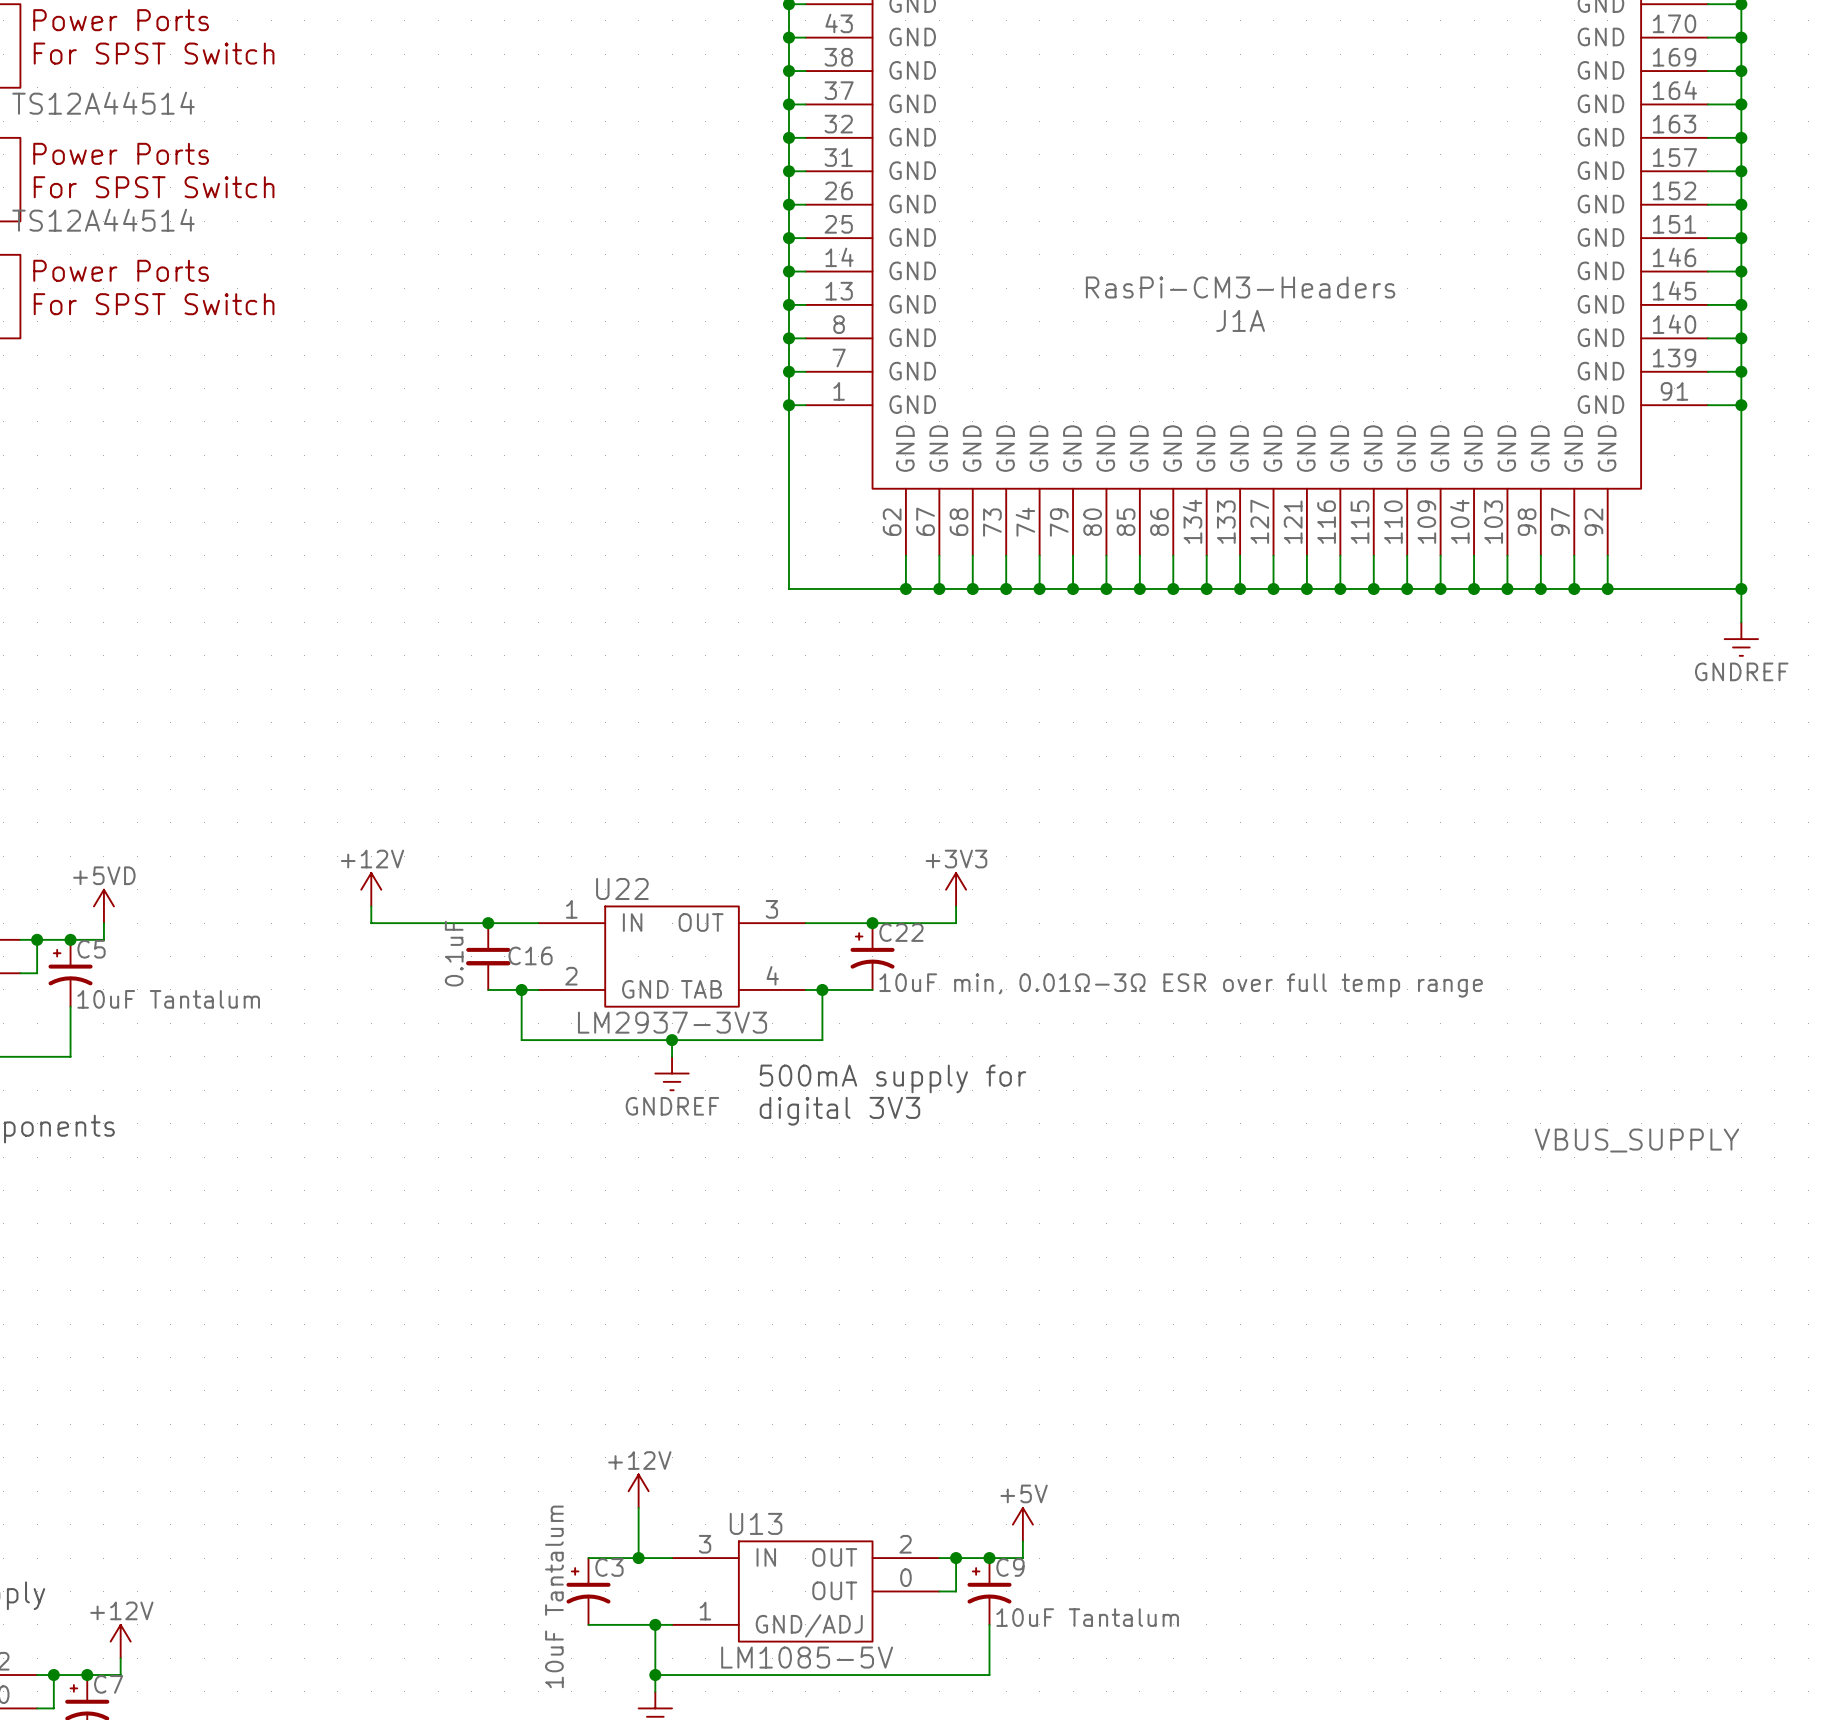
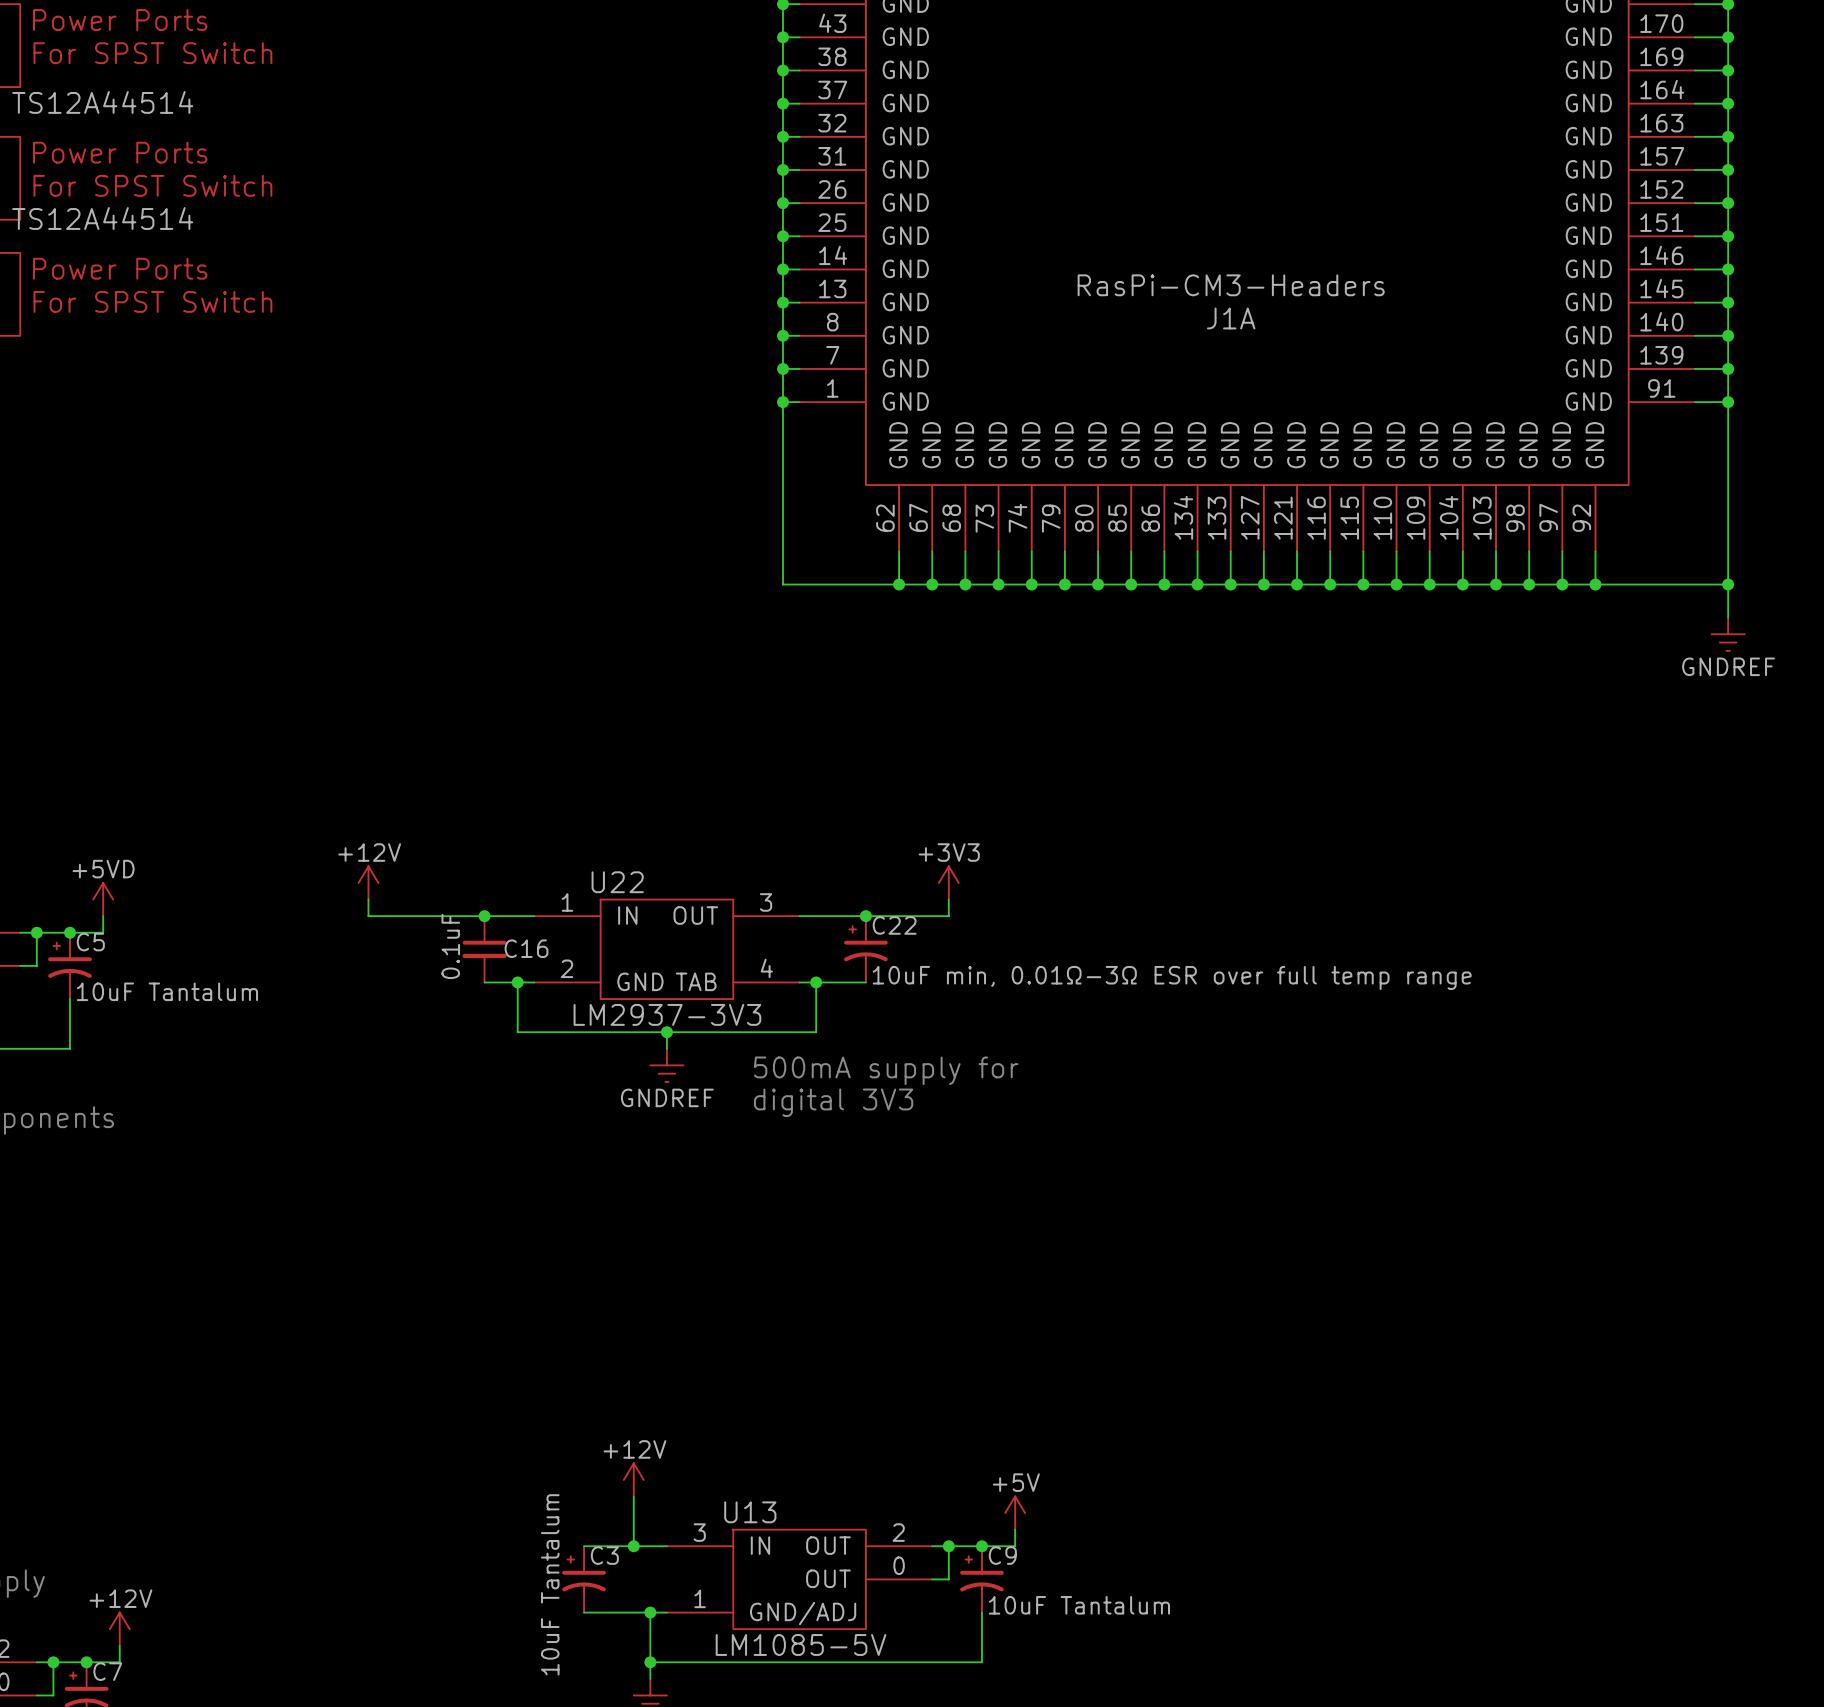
label: VBUS_SUPPLY (1636, 1140) -> none

